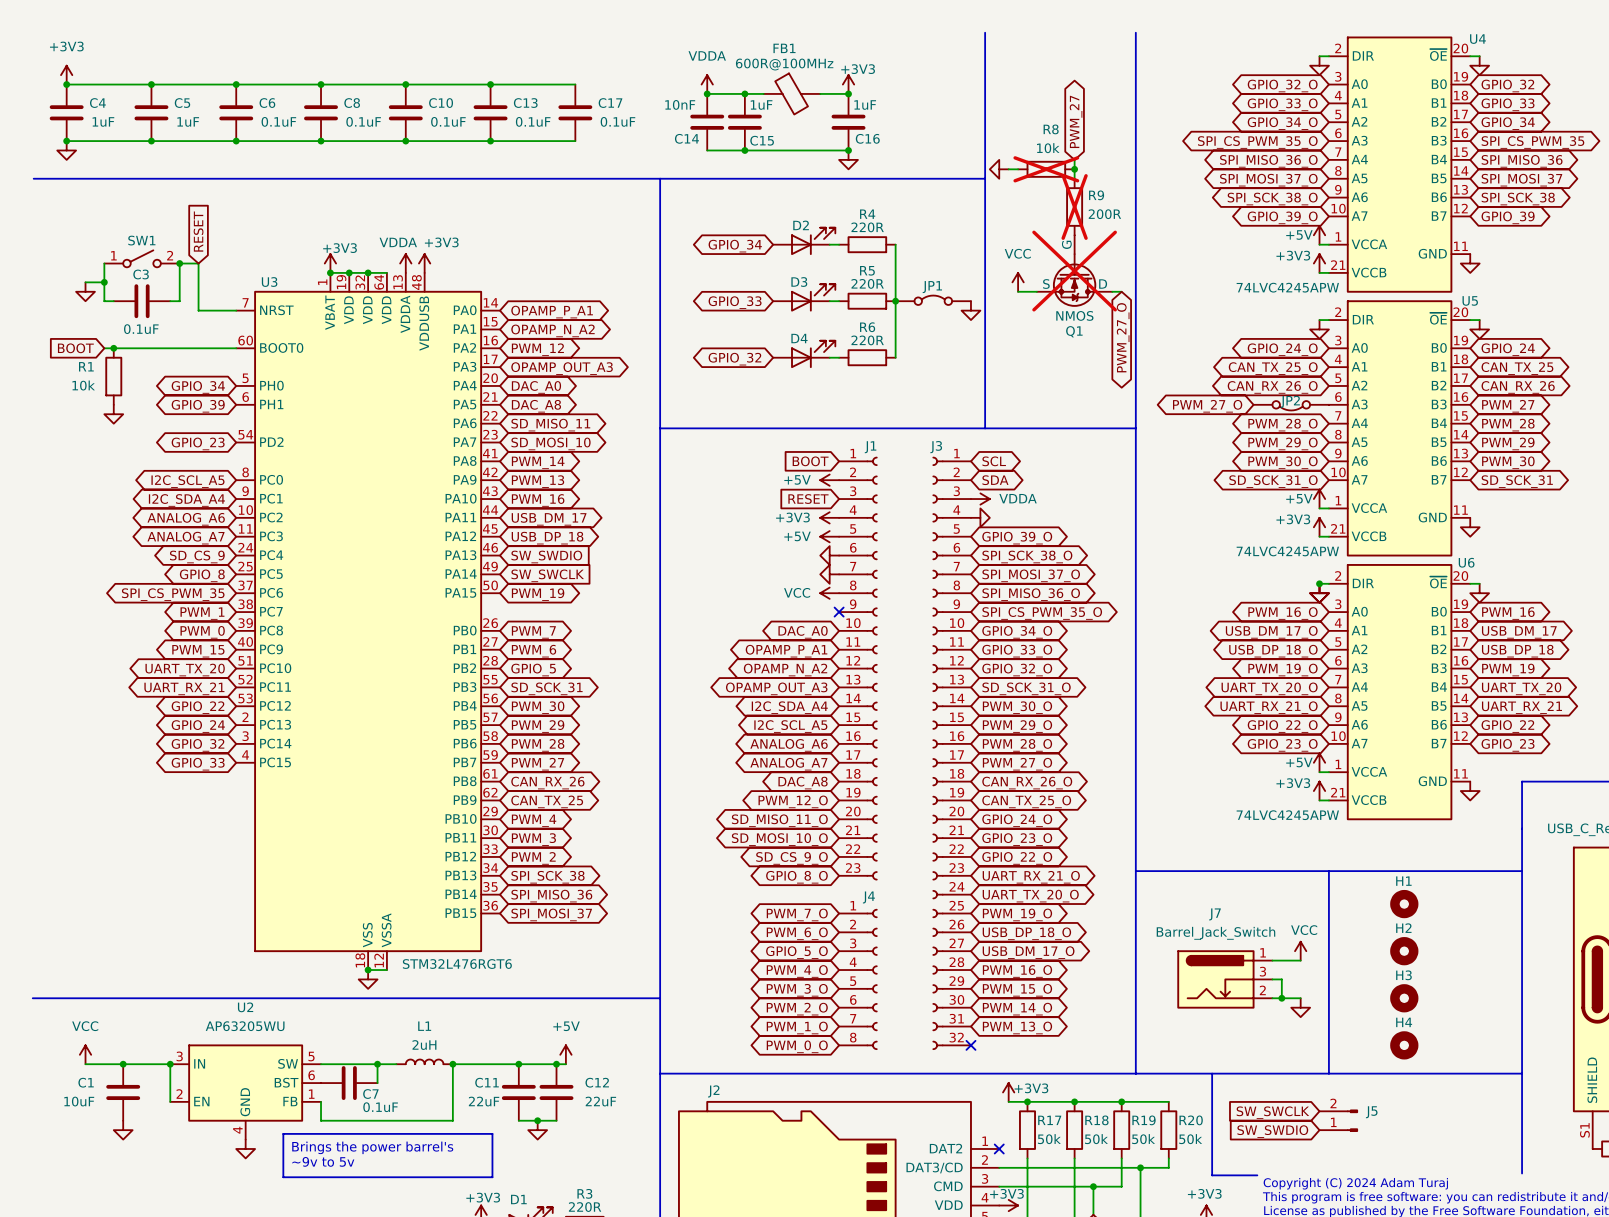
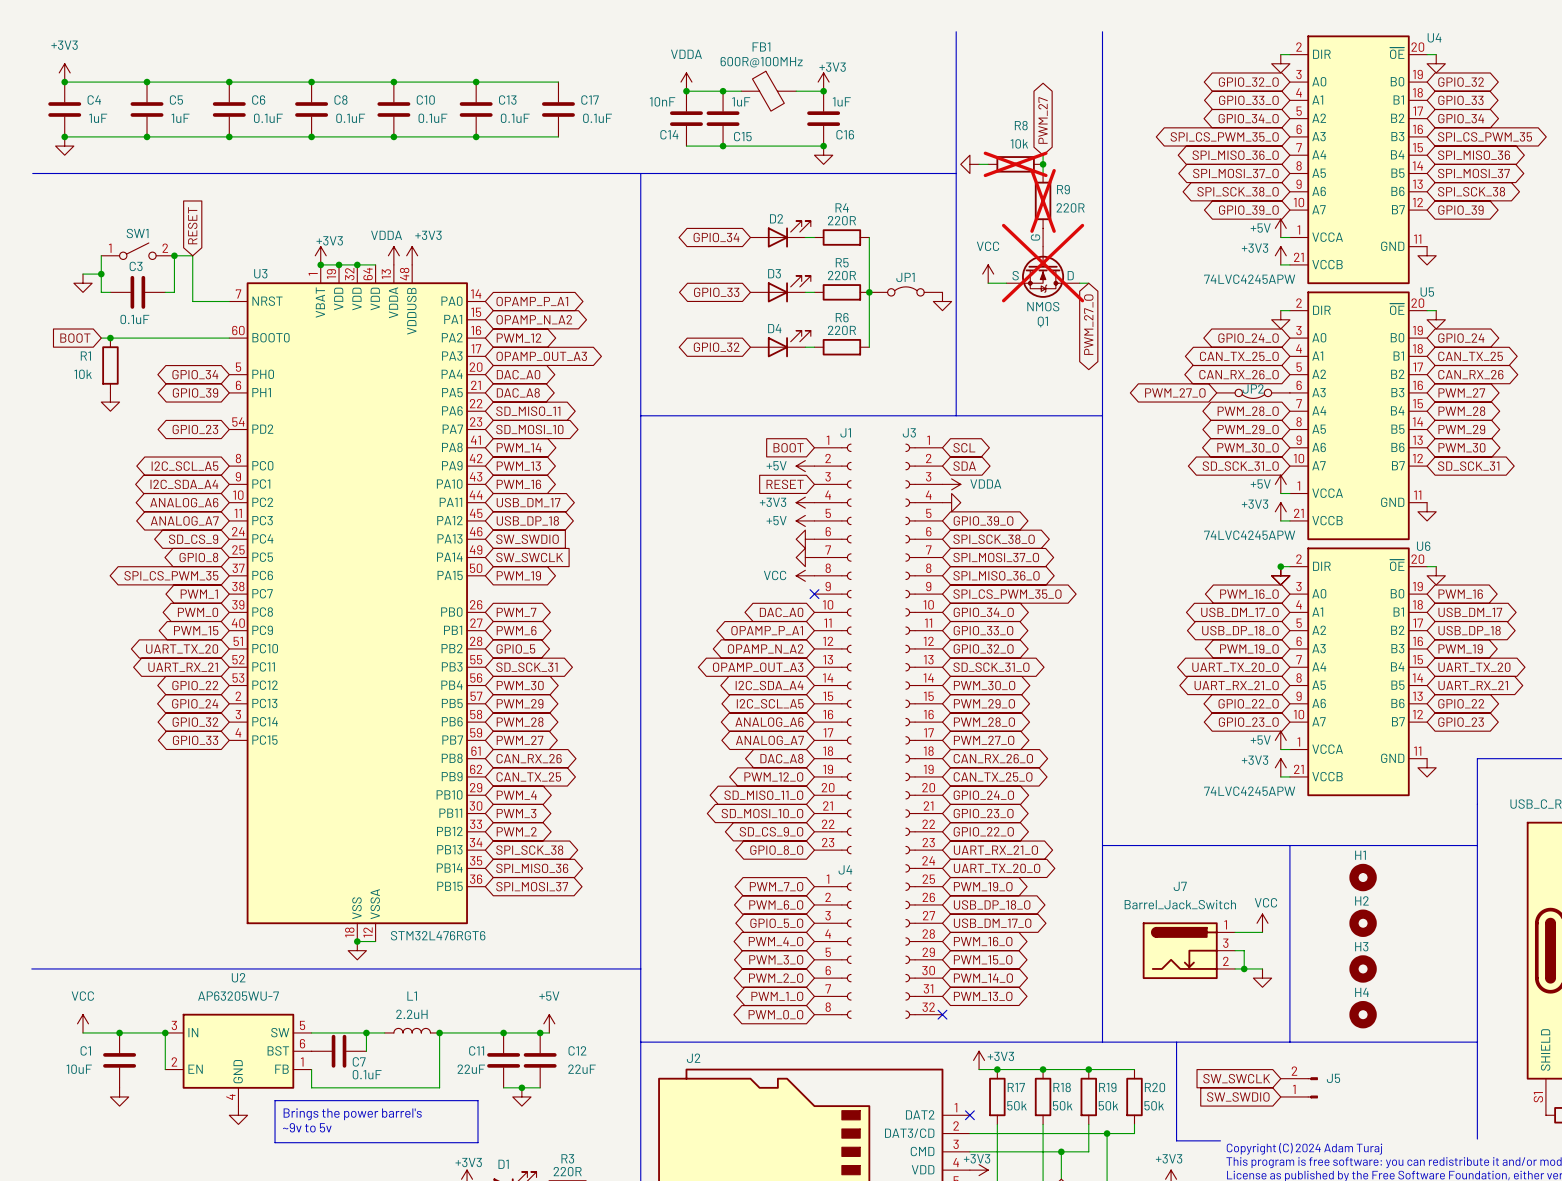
R9 value: 200R (1104, 214) -> 220R (1070, 207)
U2 value: AP63205WU (245, 1026) -> AP63205WU-7 (238, 996)
L1 value: 2uH (424, 1045) -> 2.2uH (411, 1014)

